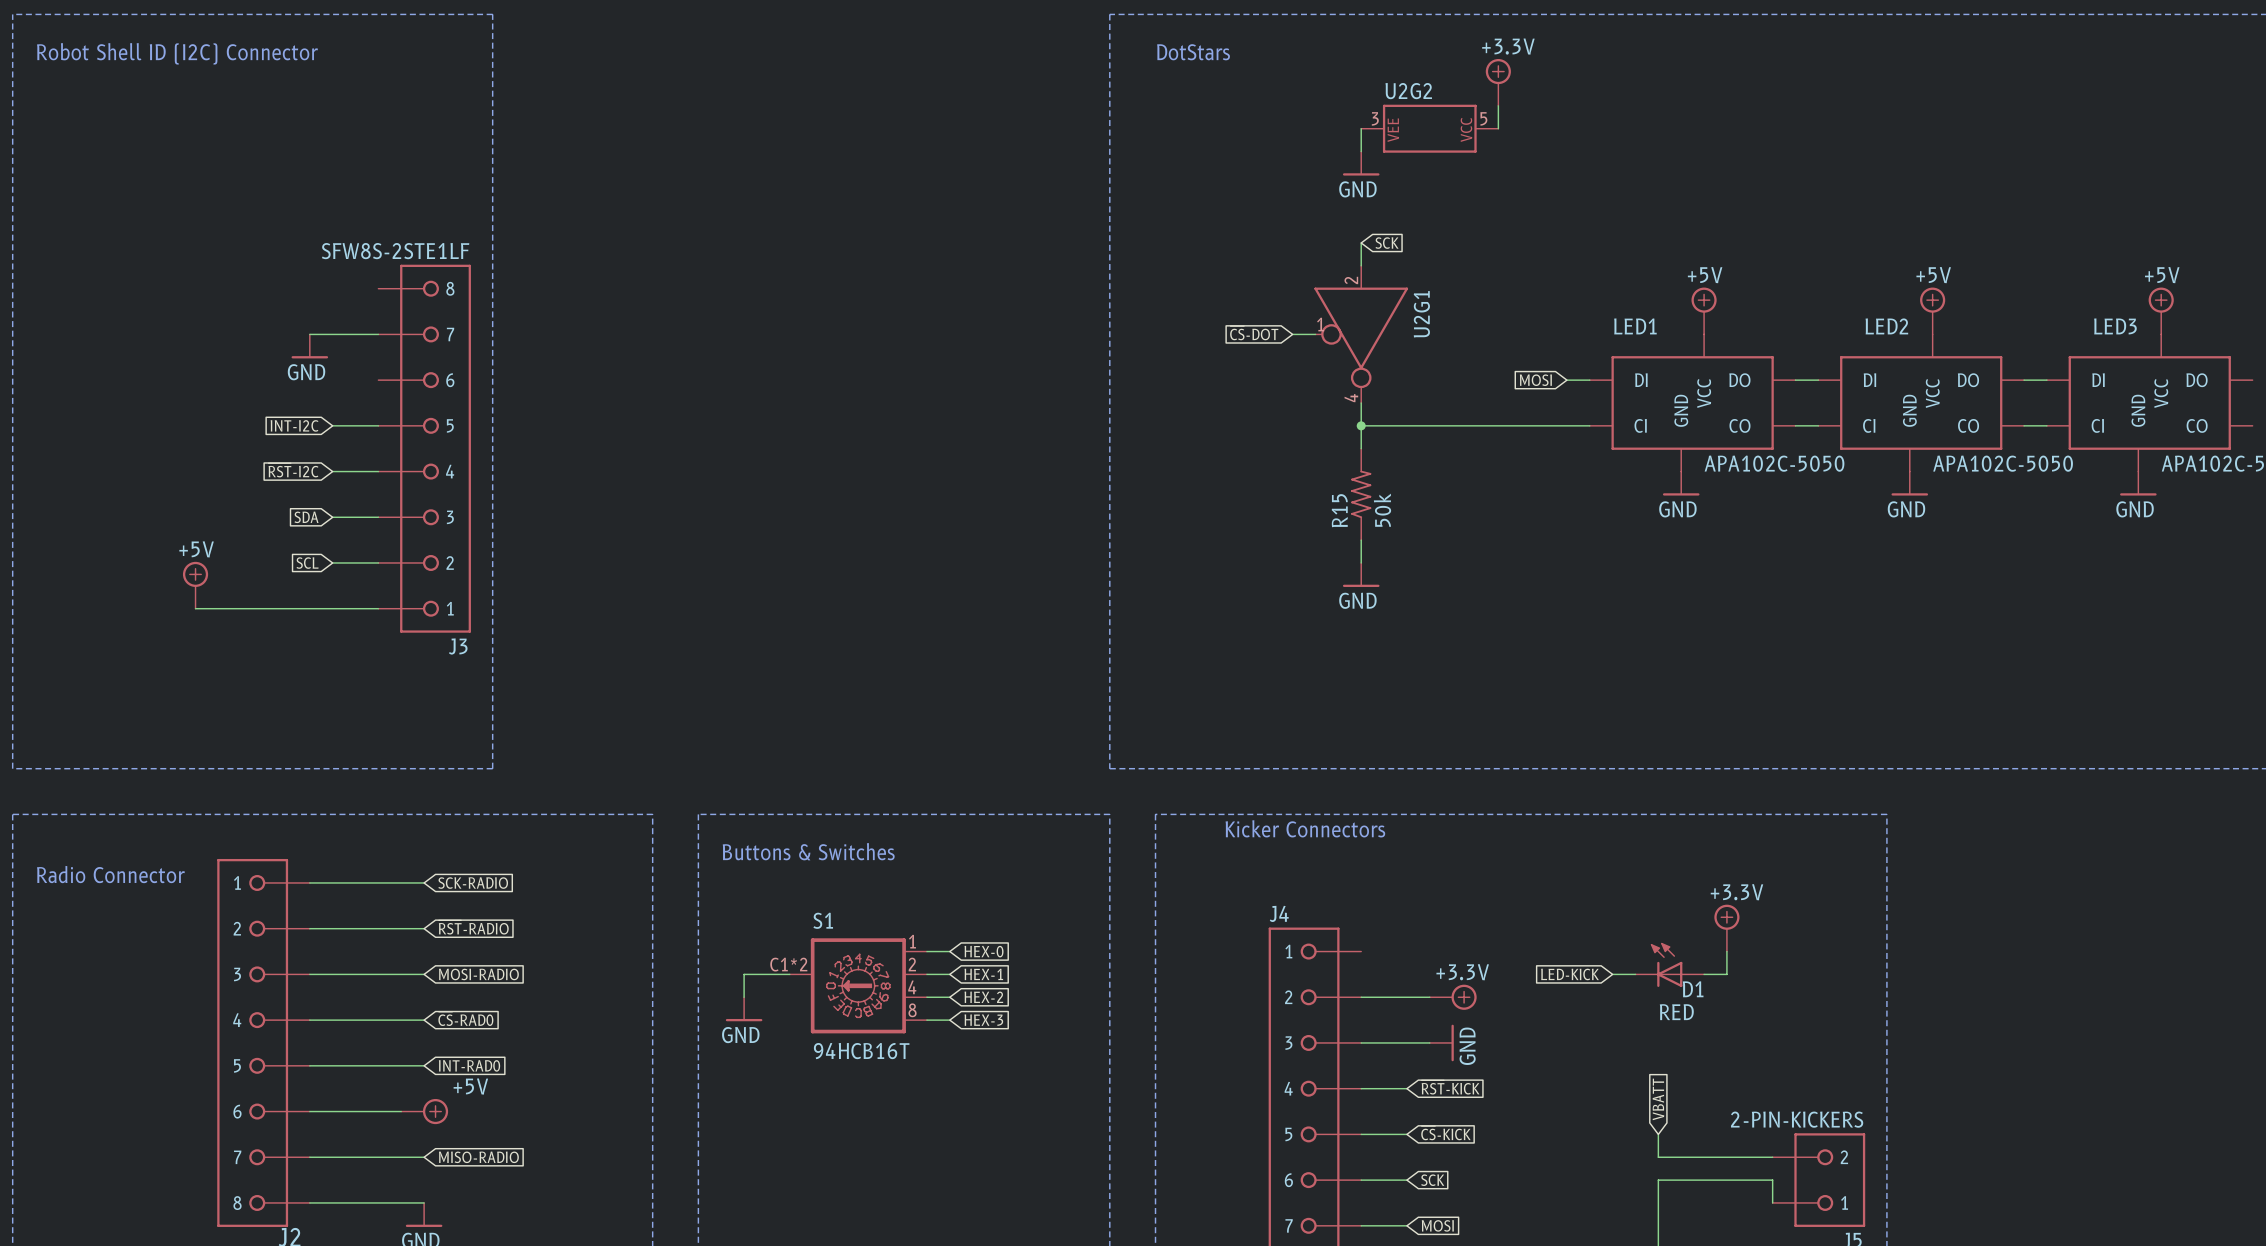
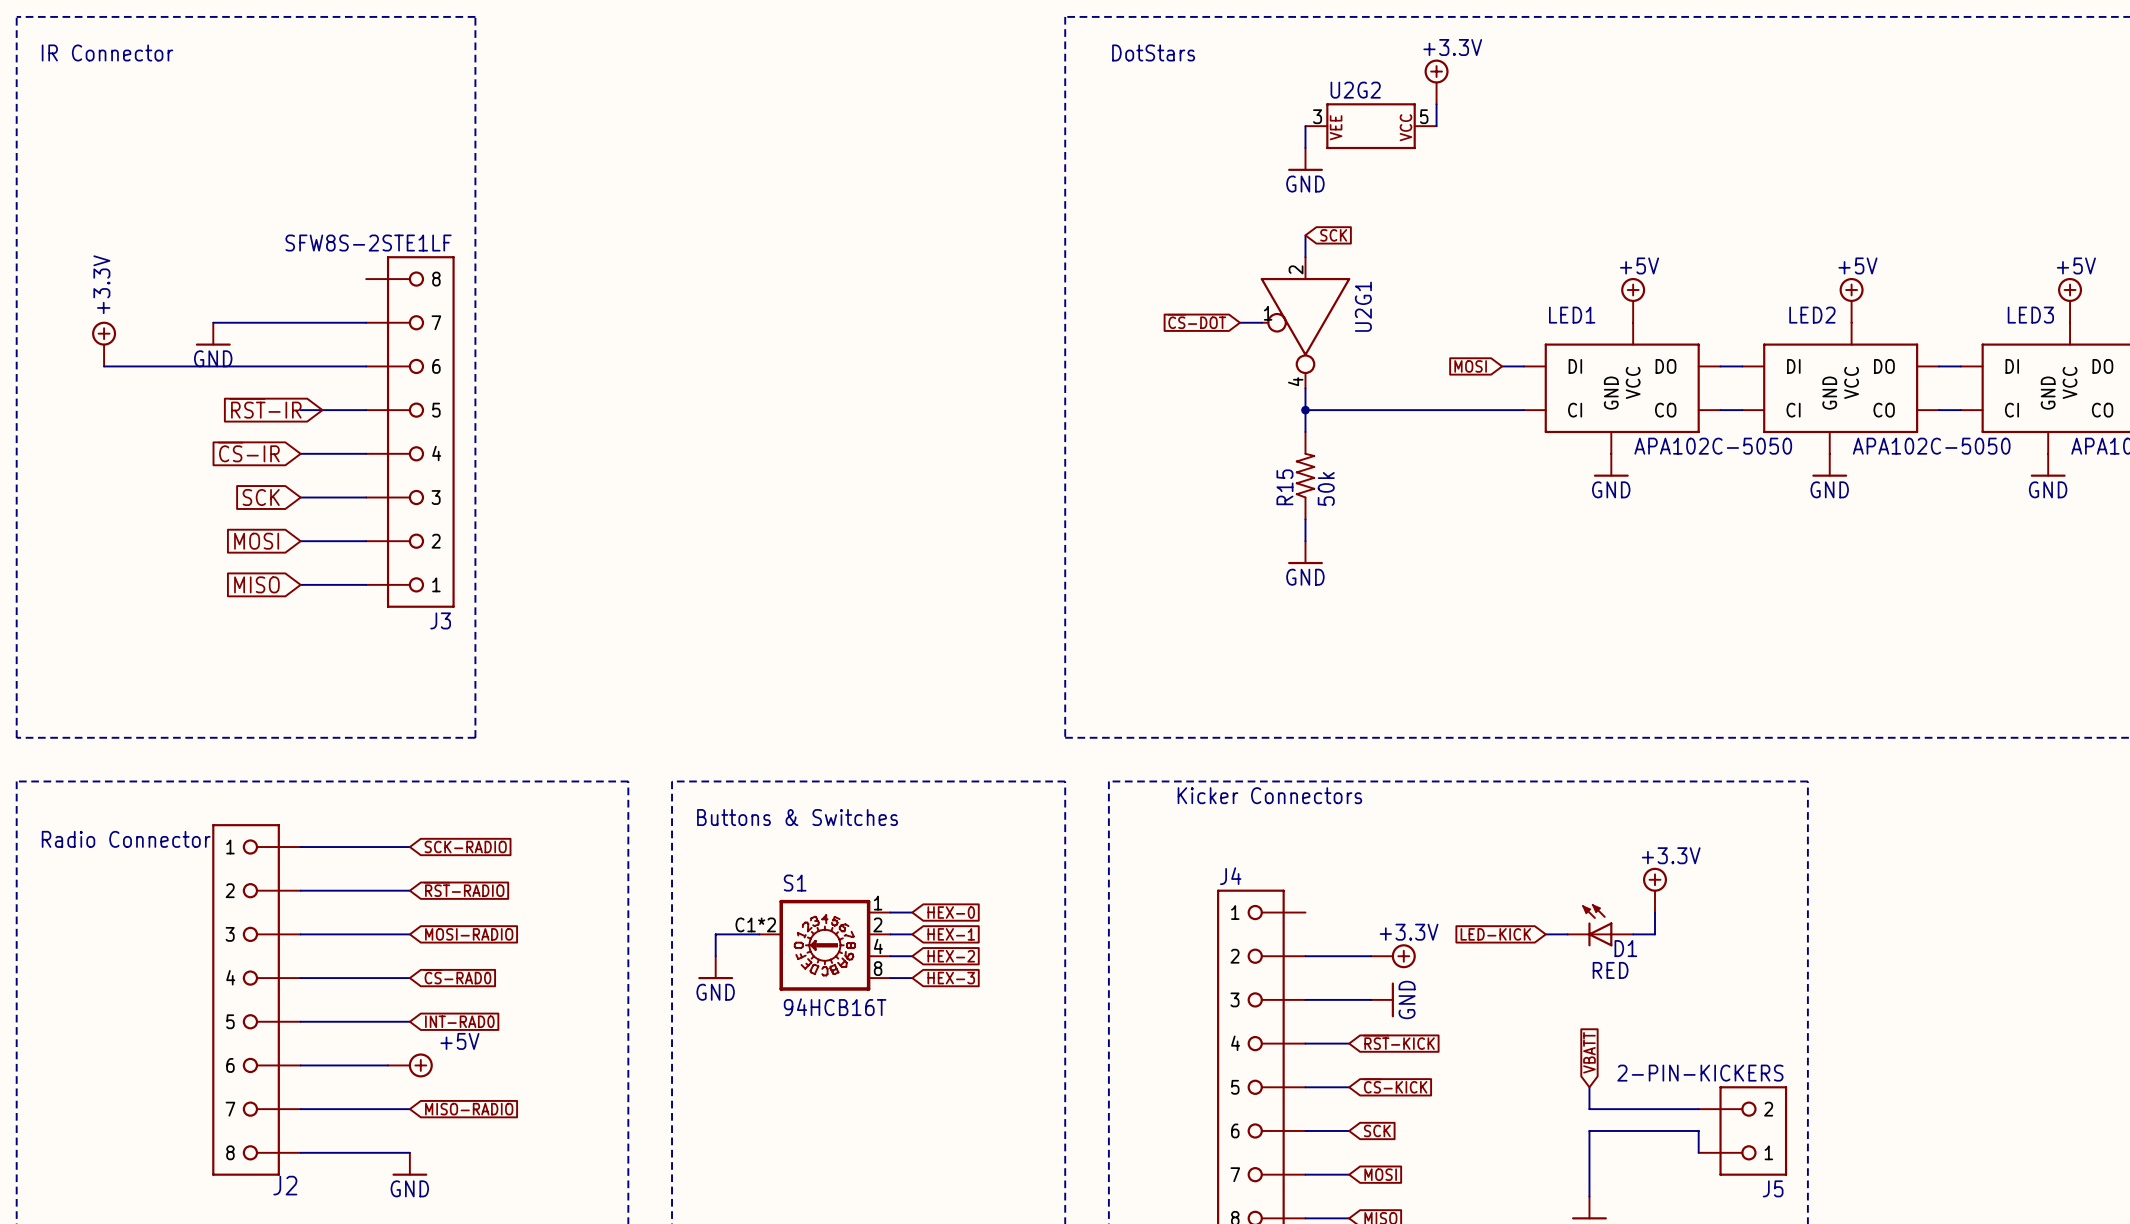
text: Robot Shell ID (I2C) Connector (177, 53) -> IR Connector (107, 52)
wire: none -> (213, 322) (300, 322)
power symbol position: GND (309, 346) -> GND (213, 334)
power symbol: none -> +3.3V (104, 344)
wire: none -> (104, 366) (366, 366)
global label: INT-I2C (294, 425) -> ~{RST}-IR (265, 408)
wire: none -> (300, 410) (322, 410)
global label: ~{RST}-I2C (293, 470) -> ~{CS}-IR (248, 452)
wire: none -> (300, 453) (322, 453)
global label: none -> SCK (261, 497)
global label: SDA (306, 517) -> none
wire: none -> (300, 497) (322, 497)
wire: none -> (300, 541) (322, 541)
global label: none -> MOSI (256, 541)
global label: SCL (307, 563) -> none
power symbol: +5V (195, 585) -> none
wire: (195, 608) (309, 608) -> none
global label: none -> MISO (256, 584)

